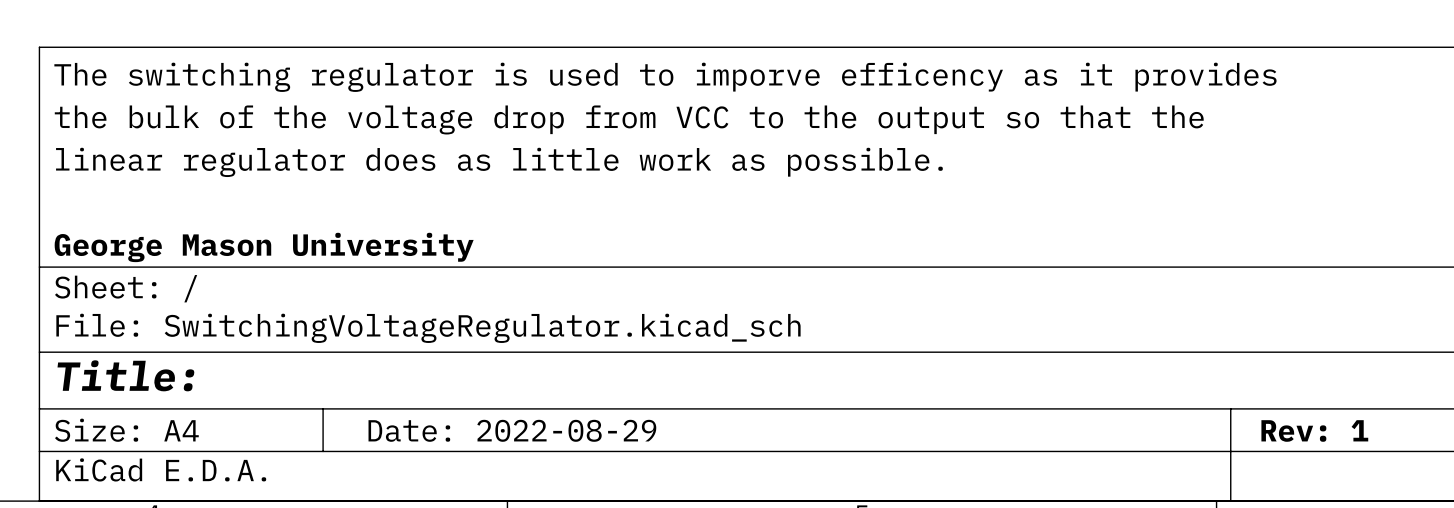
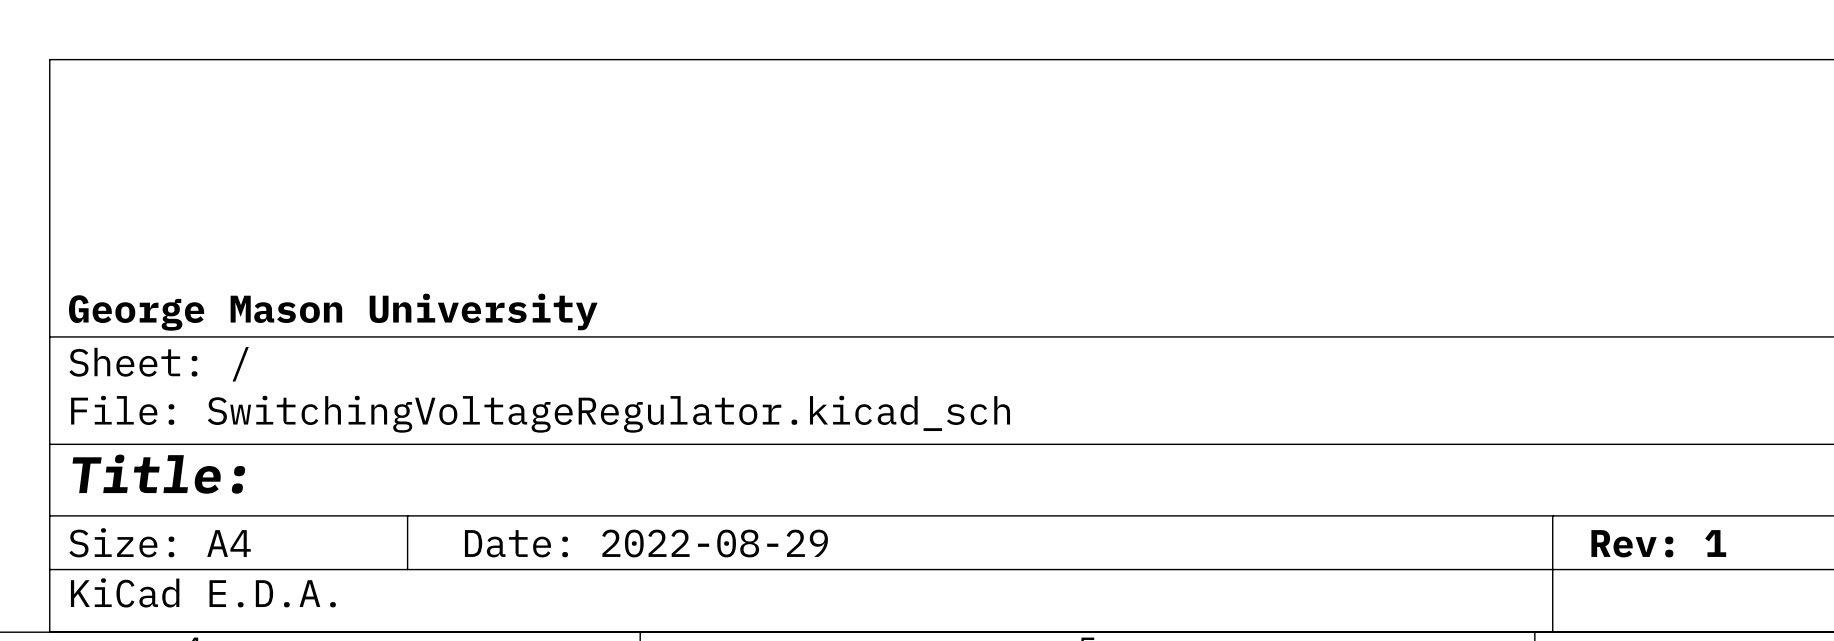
title block: The switching regulator is used to imporve efficency as it provides (665, 77) -> none
title block: the bulk of the voltage drop from VCC to the output so that the (629, 119) -> none
title block: linear regulator does as little work as possible. (499, 162) -> none

